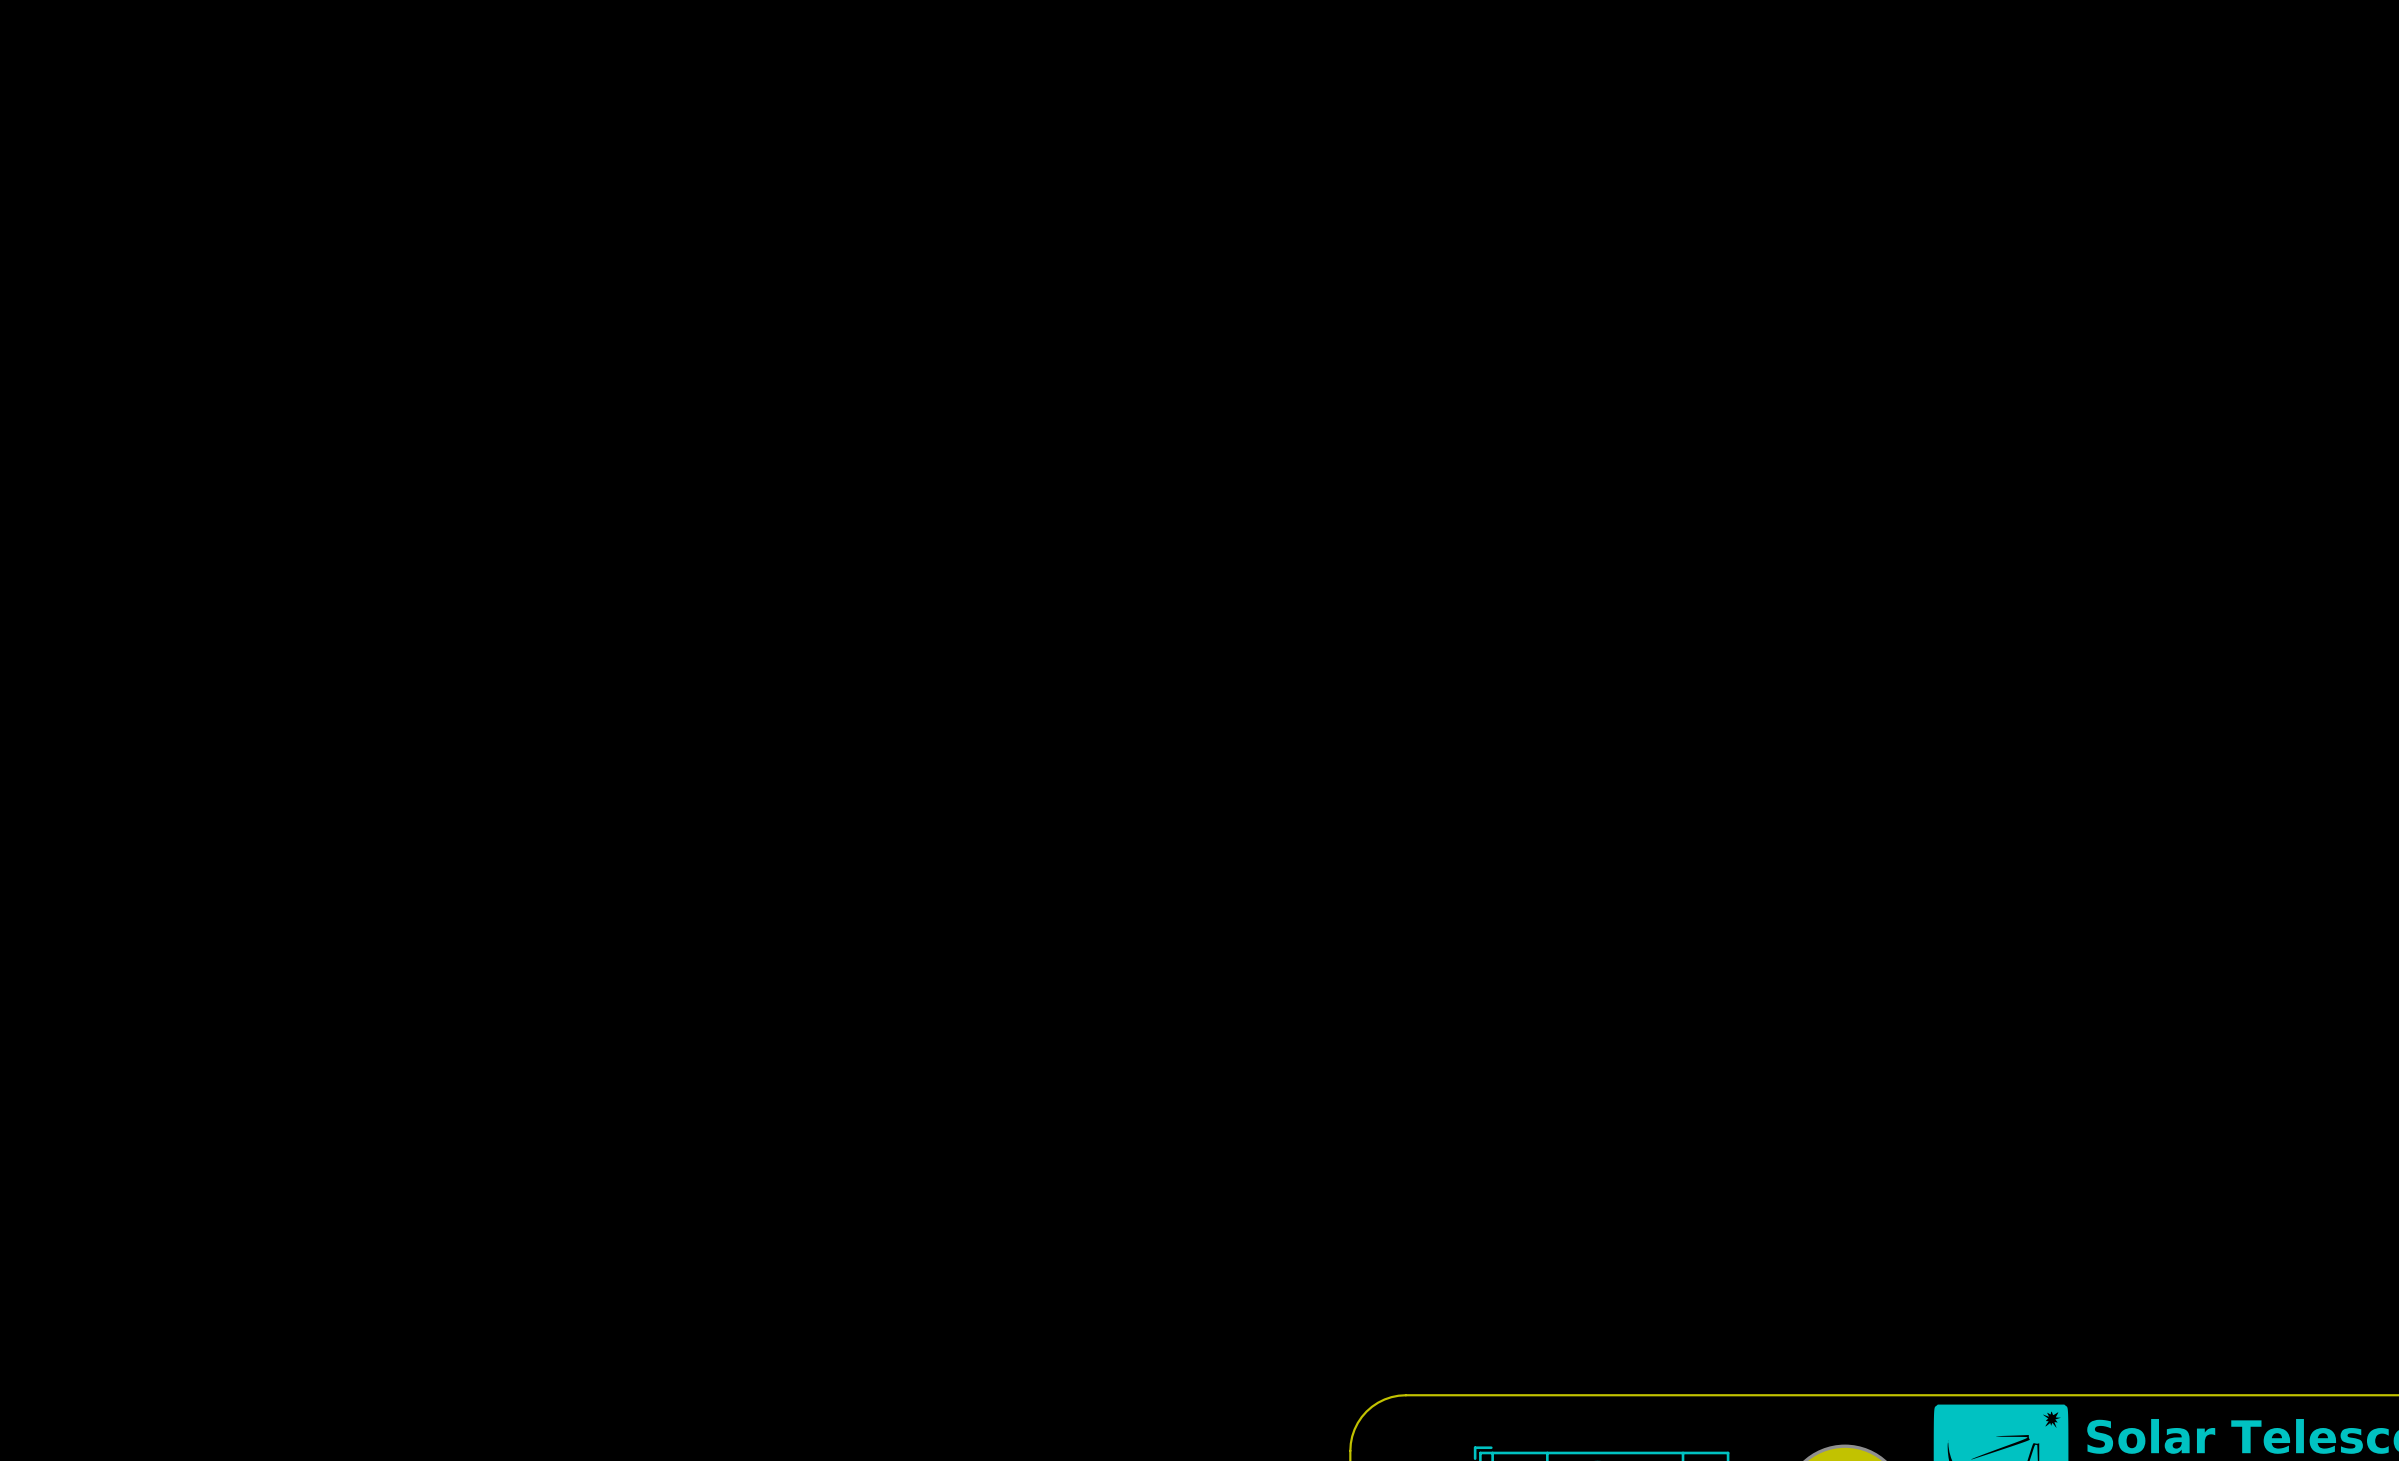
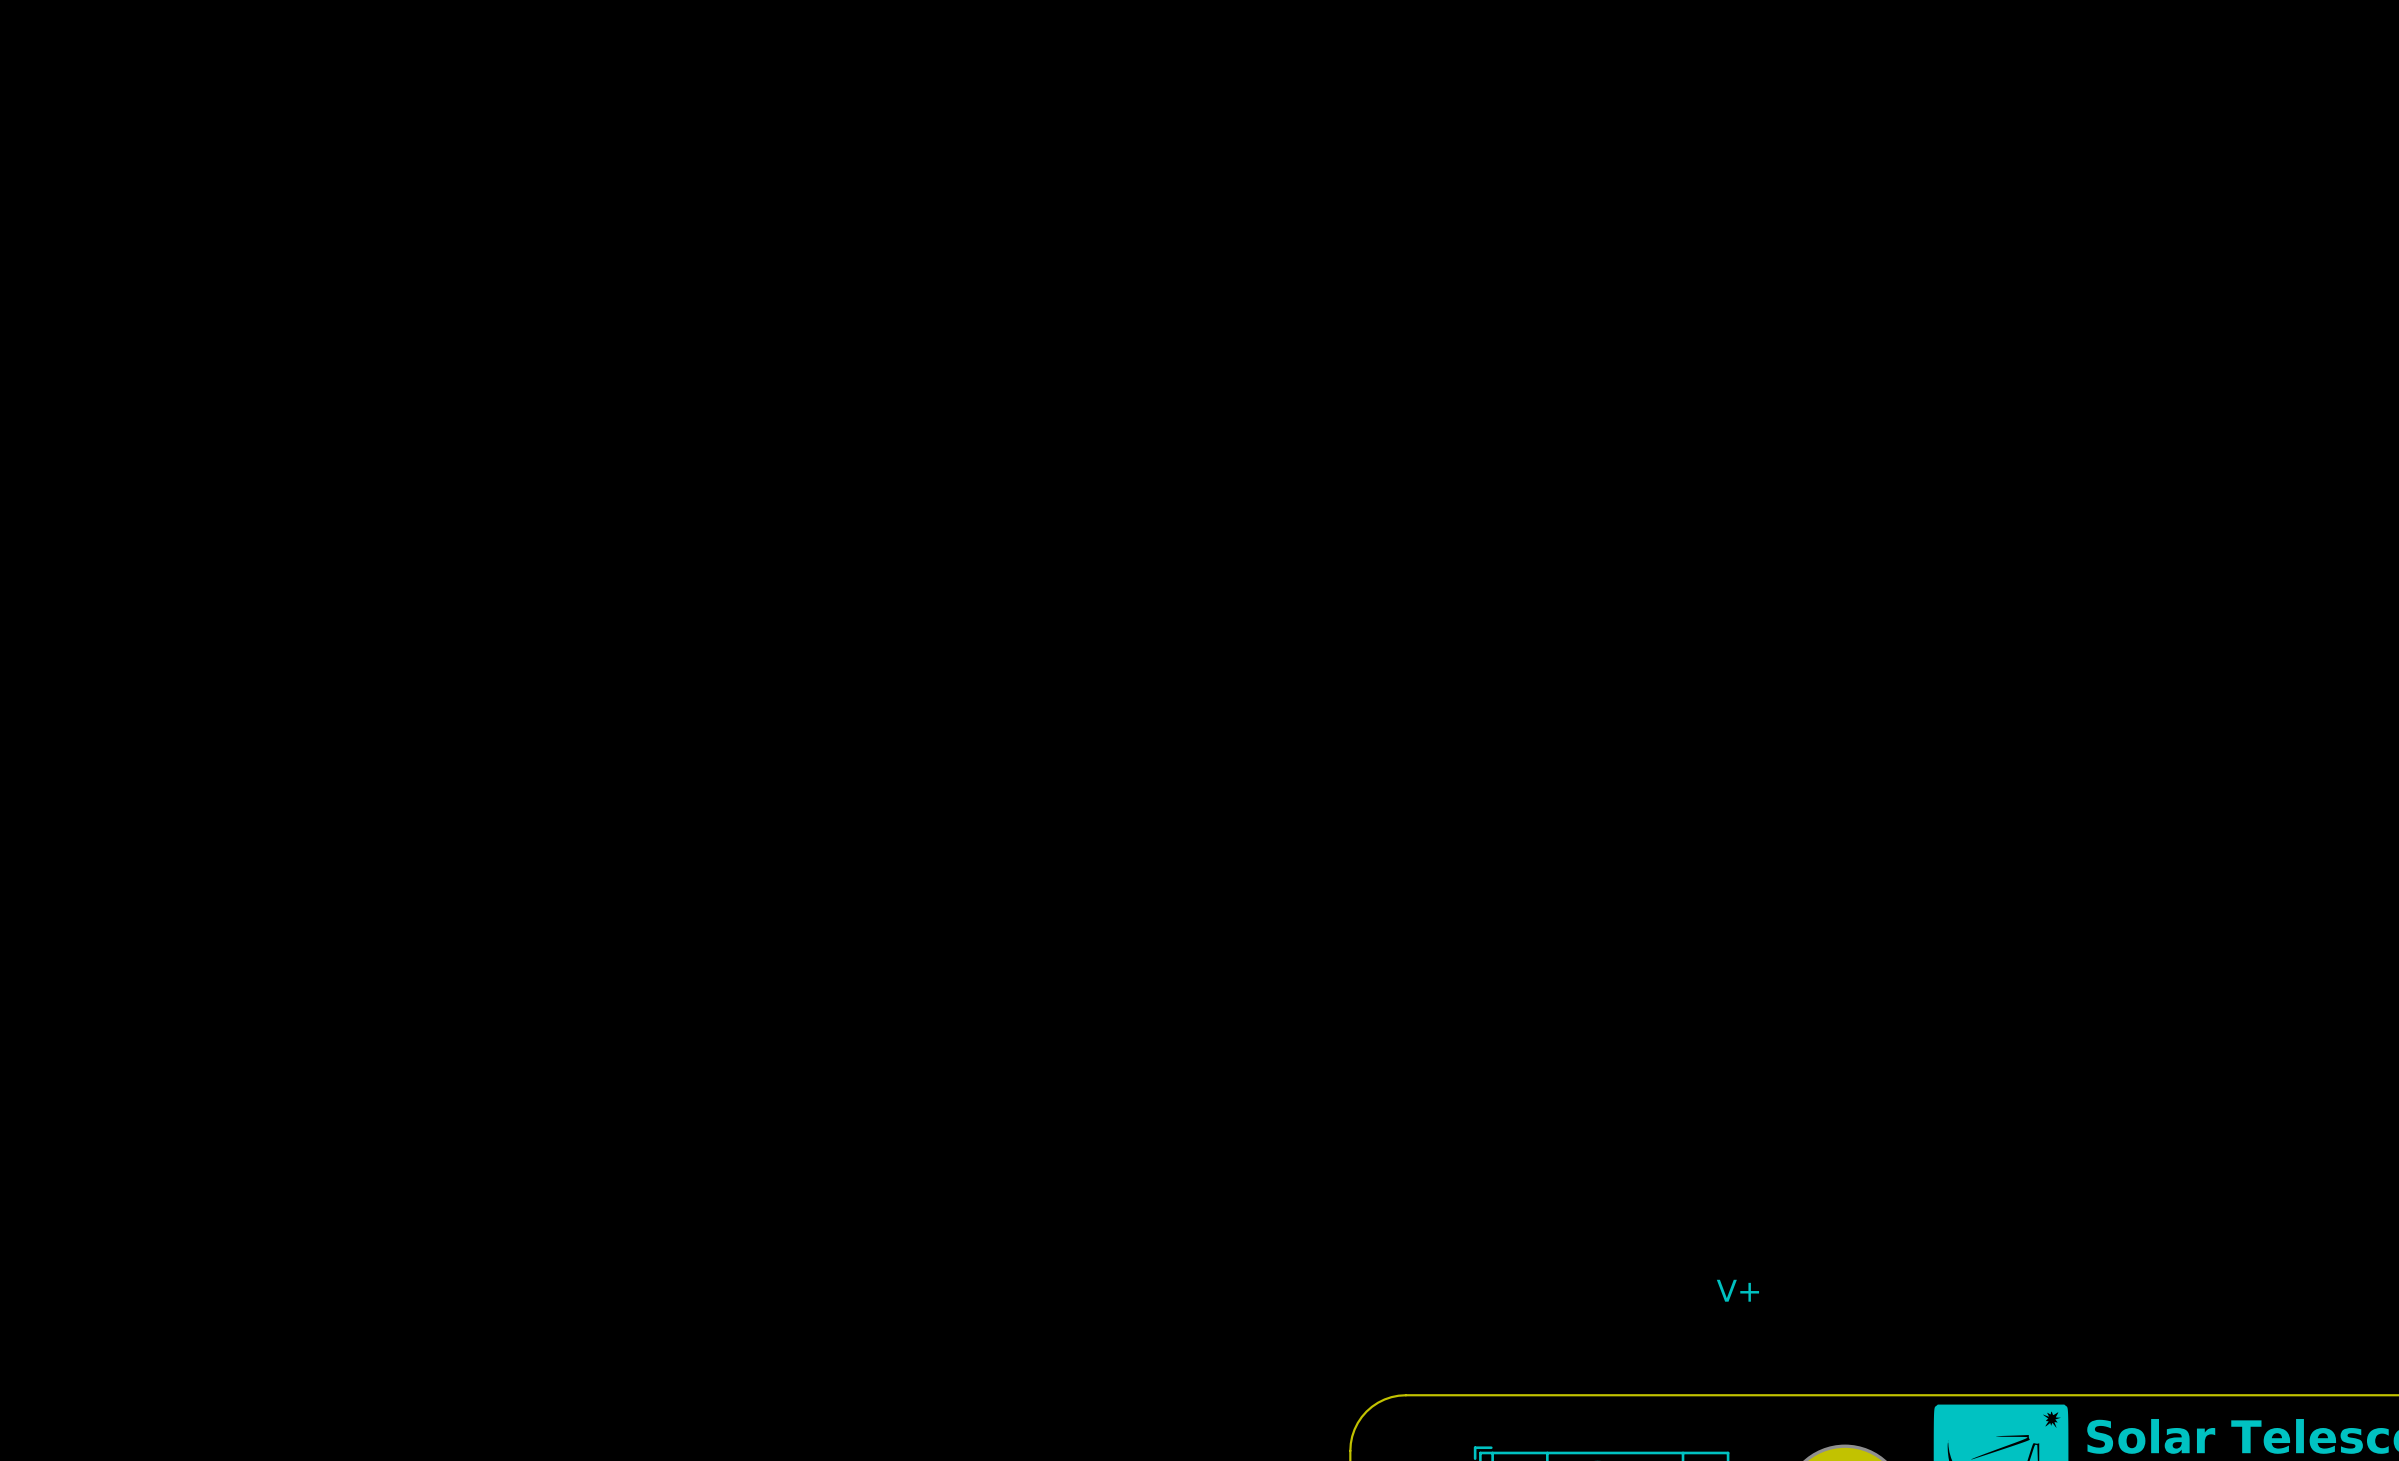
text: none -> V+ (1737, 1290)

